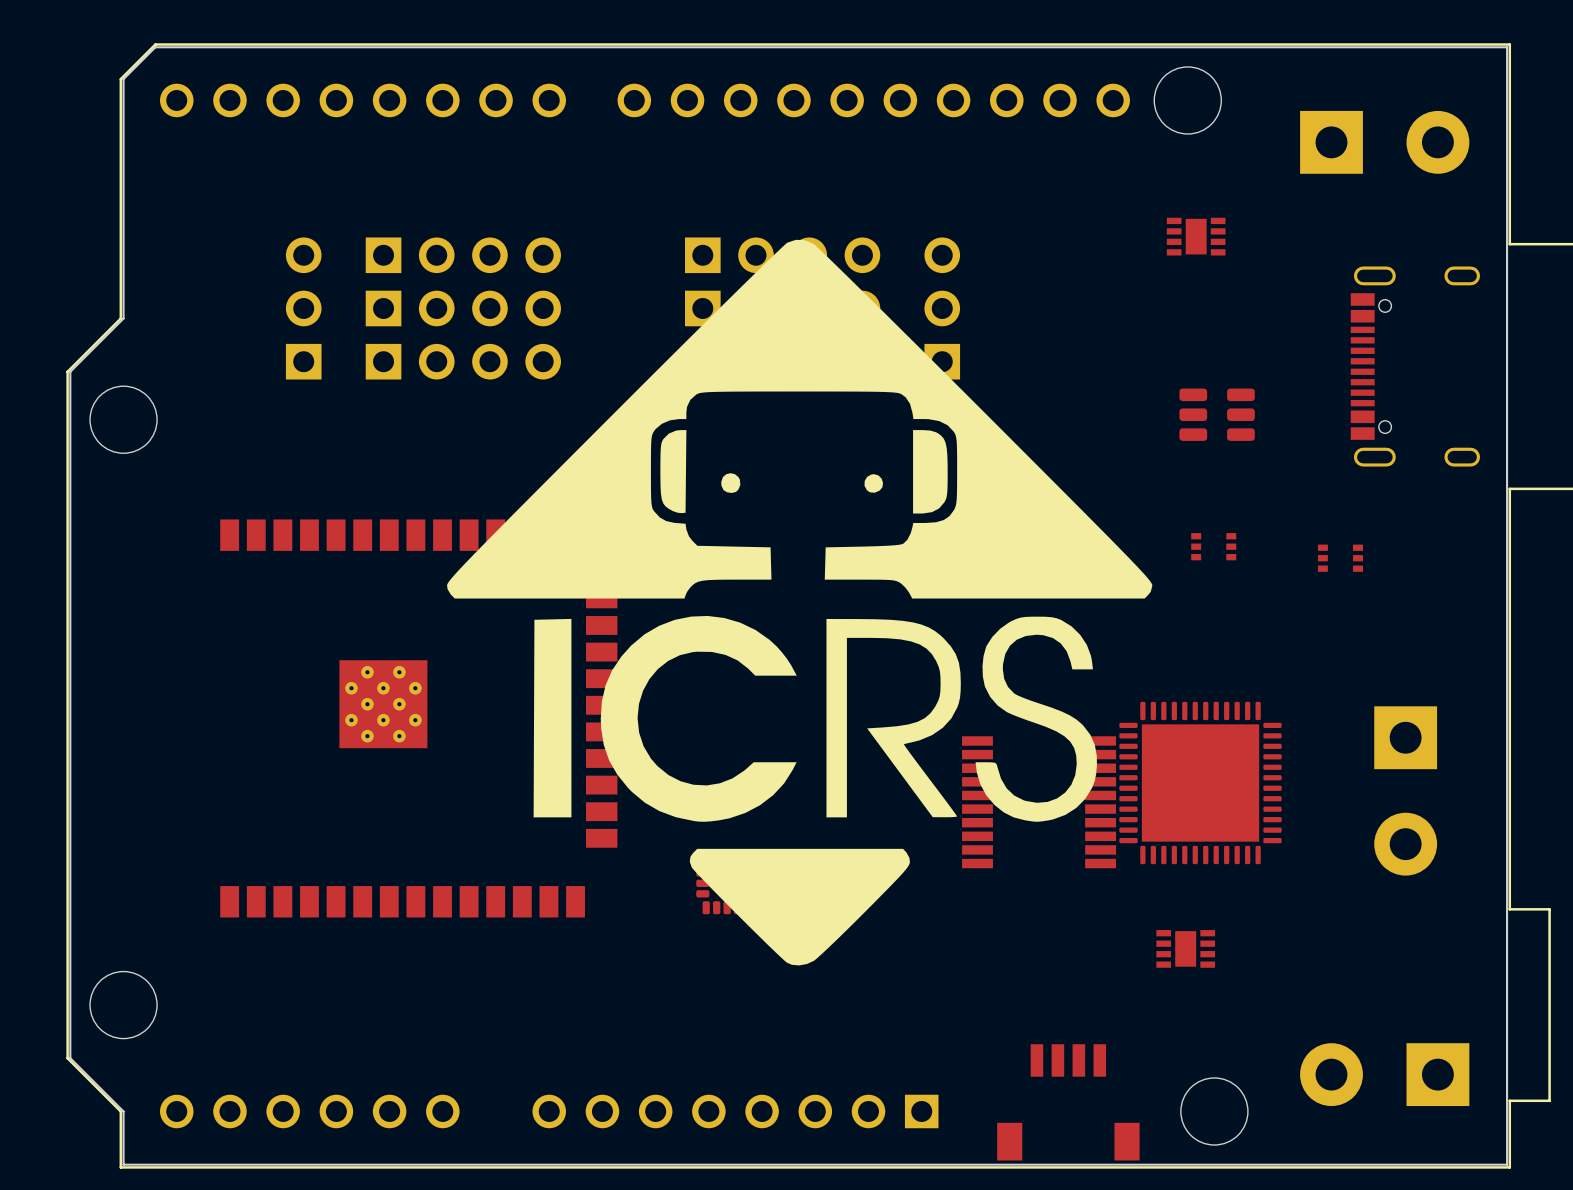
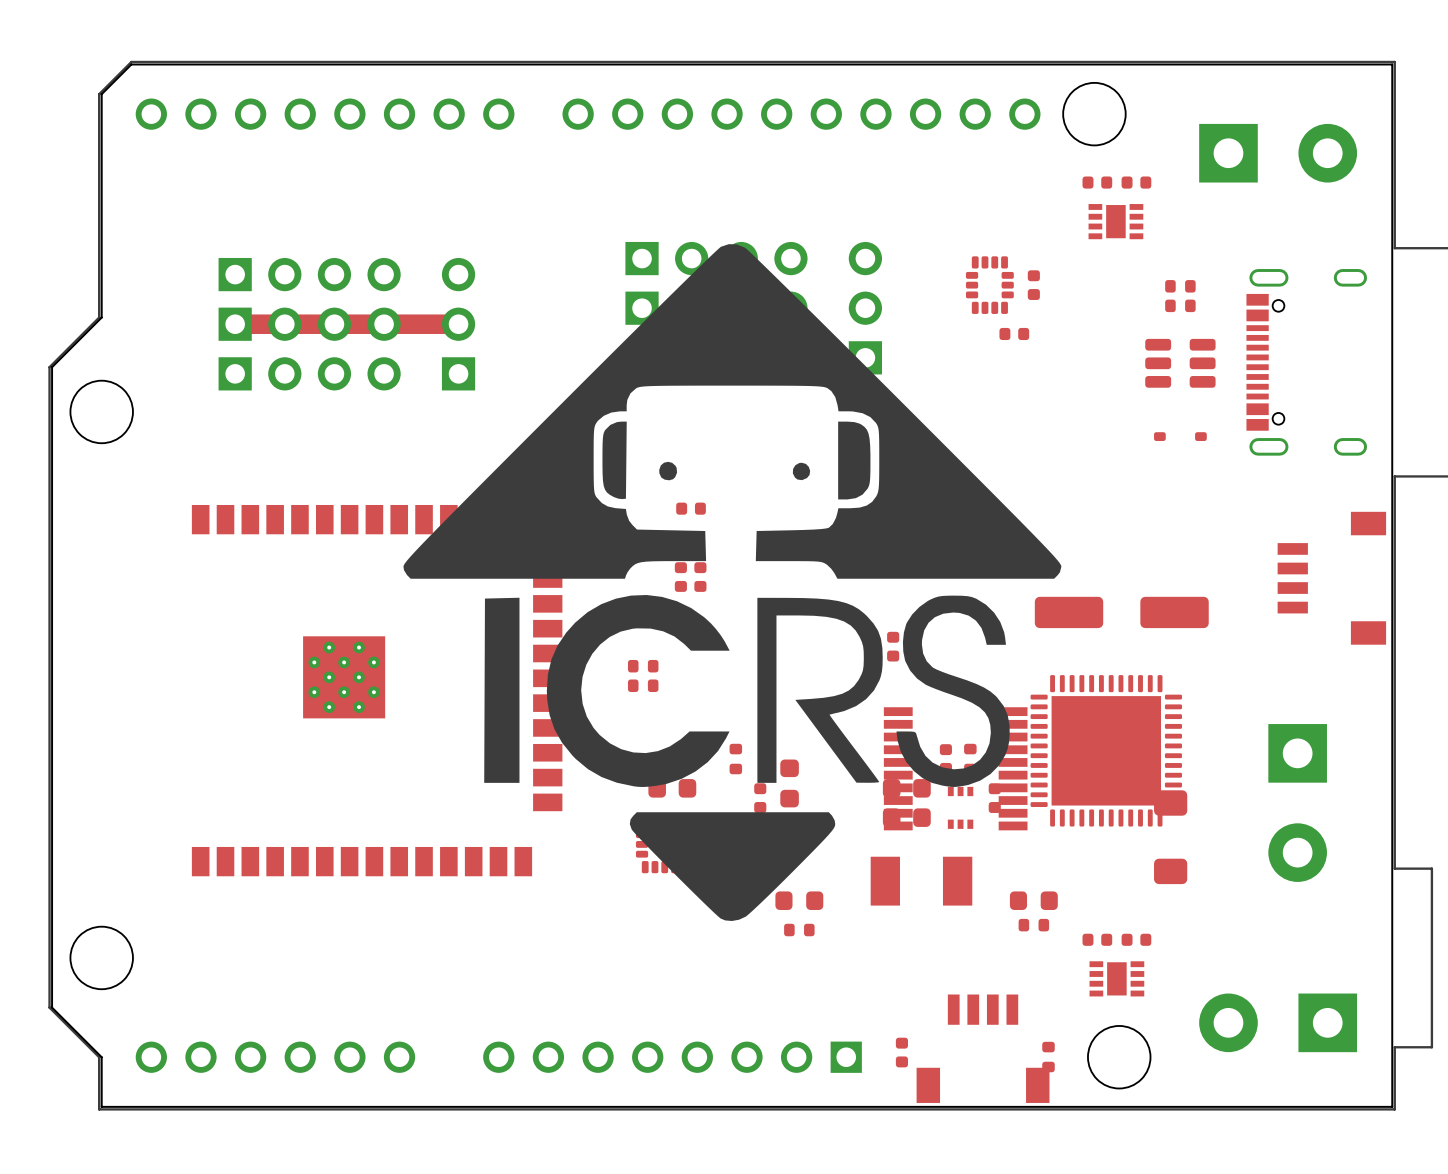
part: none -> (1097, 182)
part: none -> (1136, 182)
part position: (1196, 236) -> (1115, 221)
part: (463, 255) -> none
part: none -> (309, 274)
part: none -> (989, 285)
part: none -> (1033, 285)
part: none -> (1180, 286)
part: none -> (1180, 305)
part position: (303, 308) -> (458, 324)
part: (463, 308) -> none
part: none -> (309, 324)
top track: none -> (458, 324) (235, 324)
part: none -> (1014, 333)
part: (463, 361) -> none
part: none -> (309, 373)
part position: (1217, 414) -> (1180, 363)
part: none -> (1180, 436)
part: none -> (691, 508)
part: (1213, 546) -> none
part: (1340, 558) -> none
part: none -> (680, 577)
part: none -> (700, 577)
part: none -> (1331, 578)
part: none -> (1121, 612)
part: none -> (893, 646)
part: none -> (643, 666)
part: none -> (643, 685)
part position: (1405, 790) -> (1297, 802)
part: none -> (735, 759)
part: none -> (945, 759)
part: none -> (970, 759)
part: none -> (789, 783)
part: none -> (672, 788)
part: none -> (906, 788)
part: none -> (760, 798)
part: none -> (994, 798)
part: none -> (960, 807)
part: none -> (906, 817)
part: none -> (1170, 837)
part: none -> (921, 881)
part: none -> (799, 900)
part: none -> (1033, 900)
part position: (1185, 948) -> (1116, 978)
part: none -> (1033, 925)
part: none -> (799, 930)
part: none -> (1097, 939)
part: none -> (1136, 939)
part: none -> (901, 1052)
part: none -> (1048, 1057)

